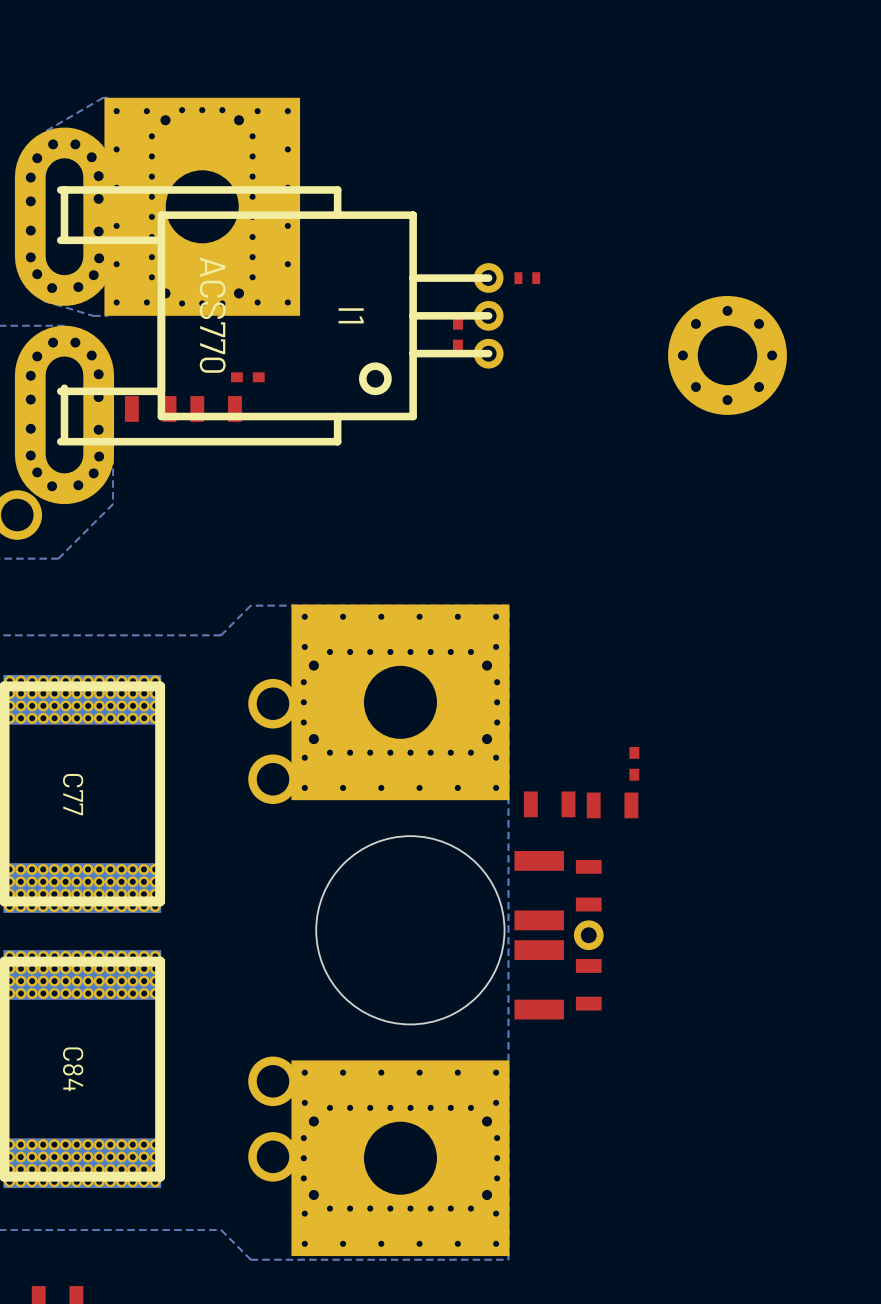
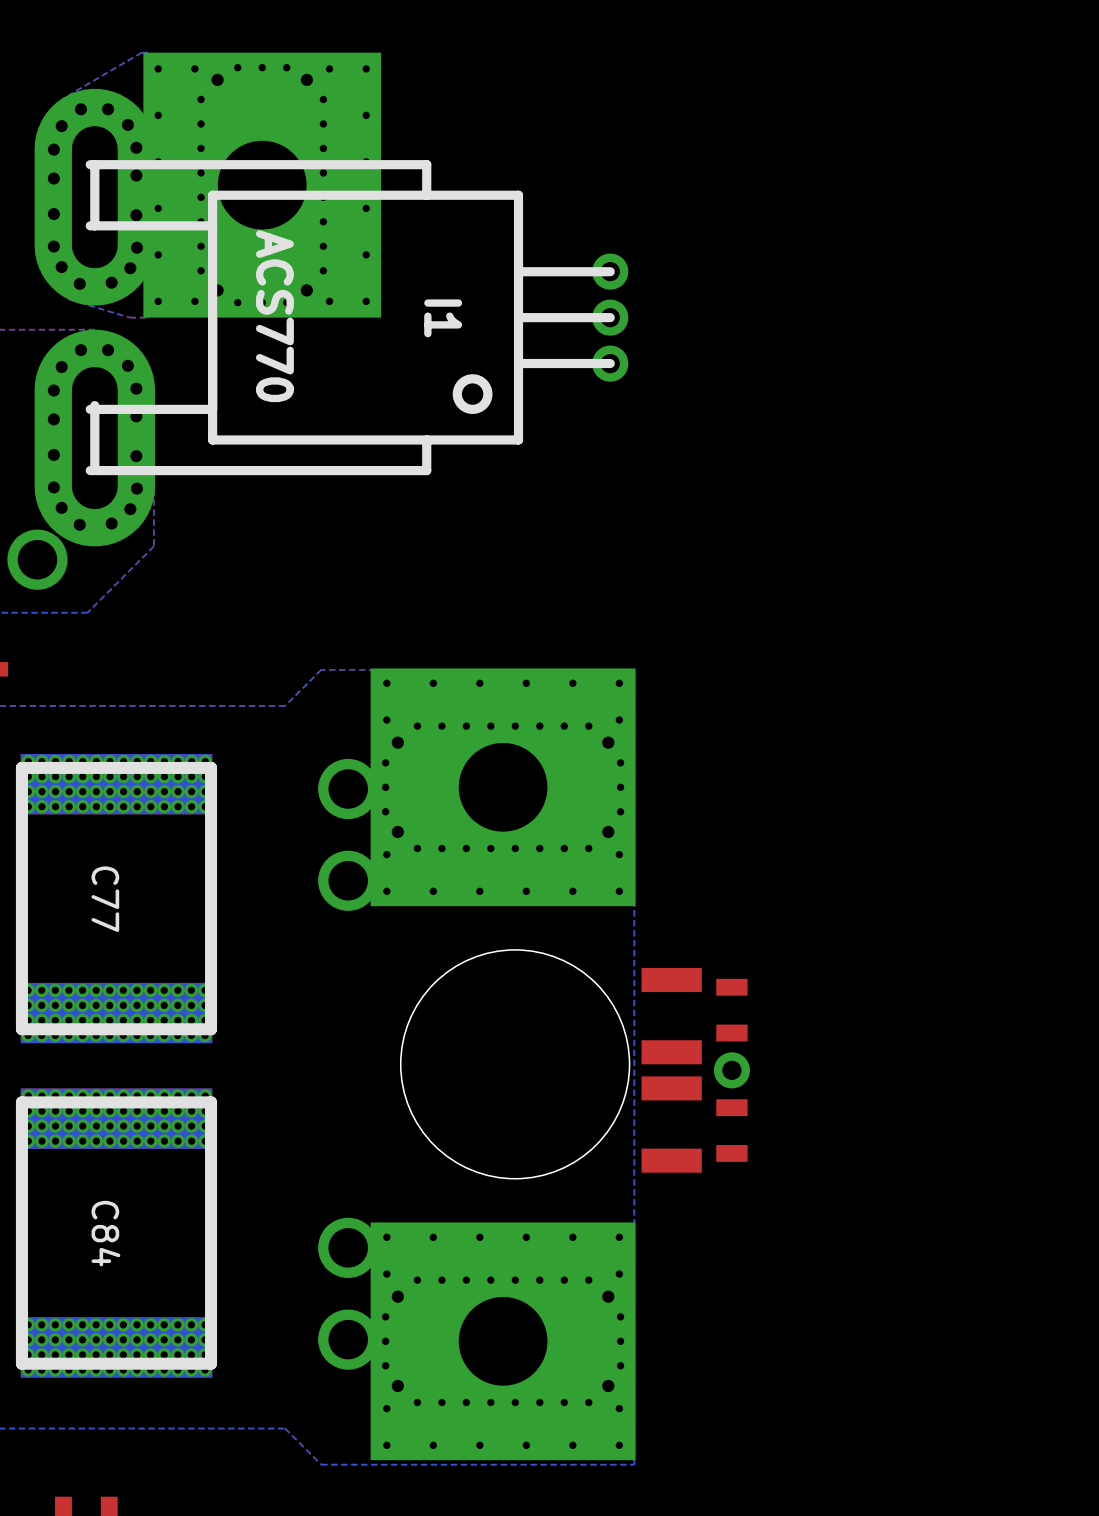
part: (527, 278) -> none
part: (457, 334) -> none
part: (727, 355) -> none
part: (247, 377) -> none
part: (150, 408) -> none
part: (216, 408) -> none
part: (634, 763) -> none
part: (549, 804) -> none
part: (612, 805) -> none

